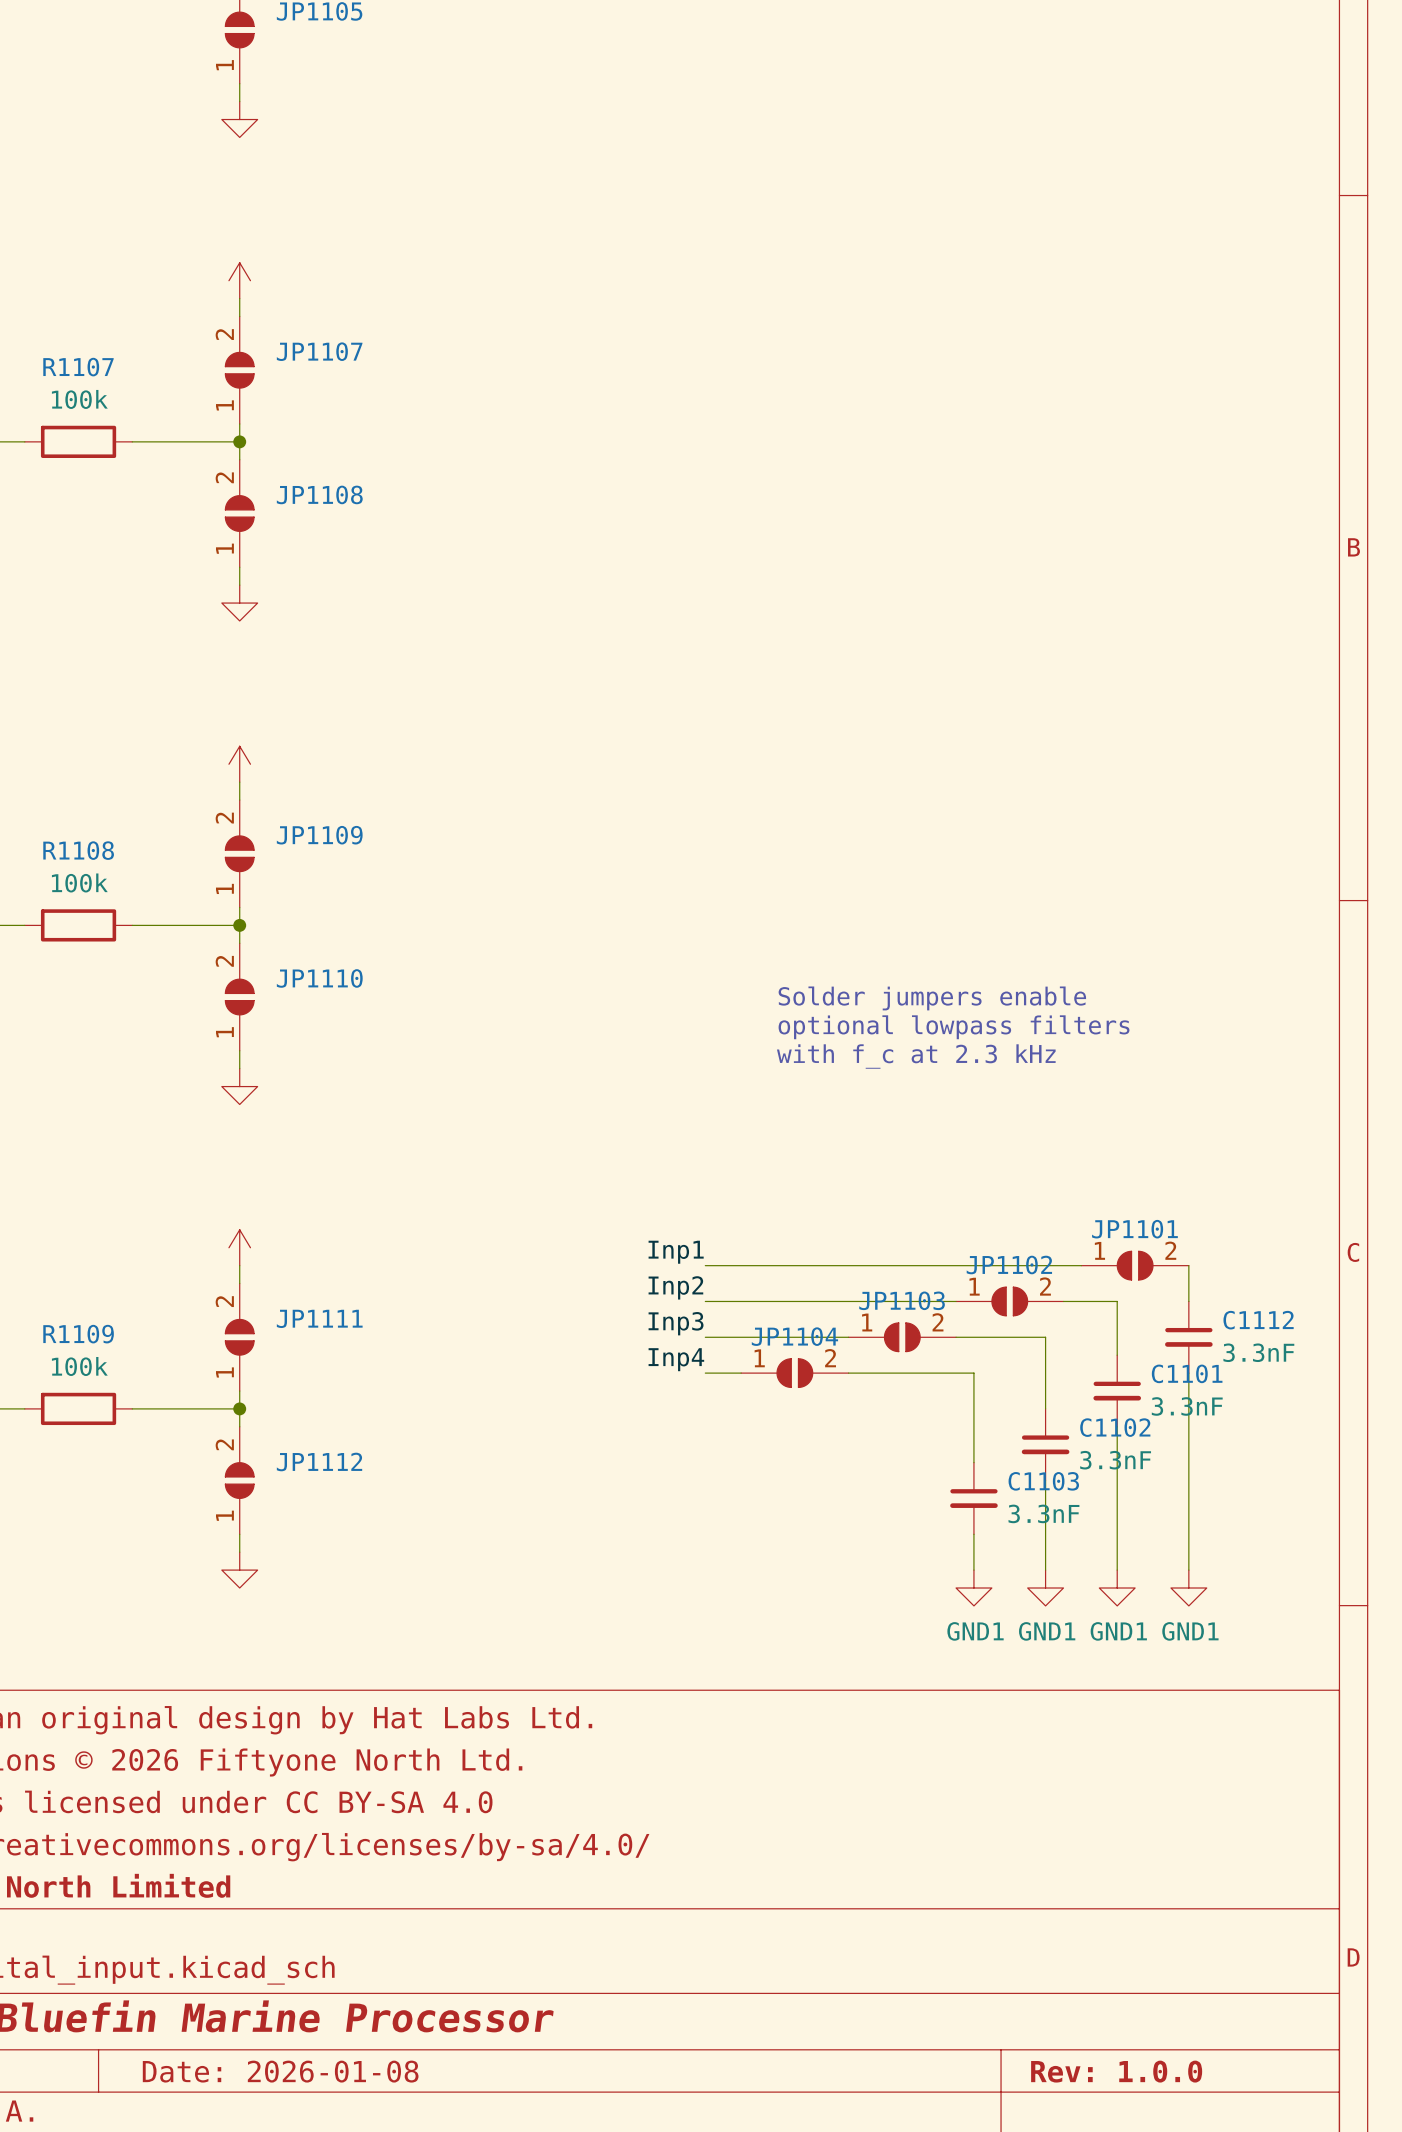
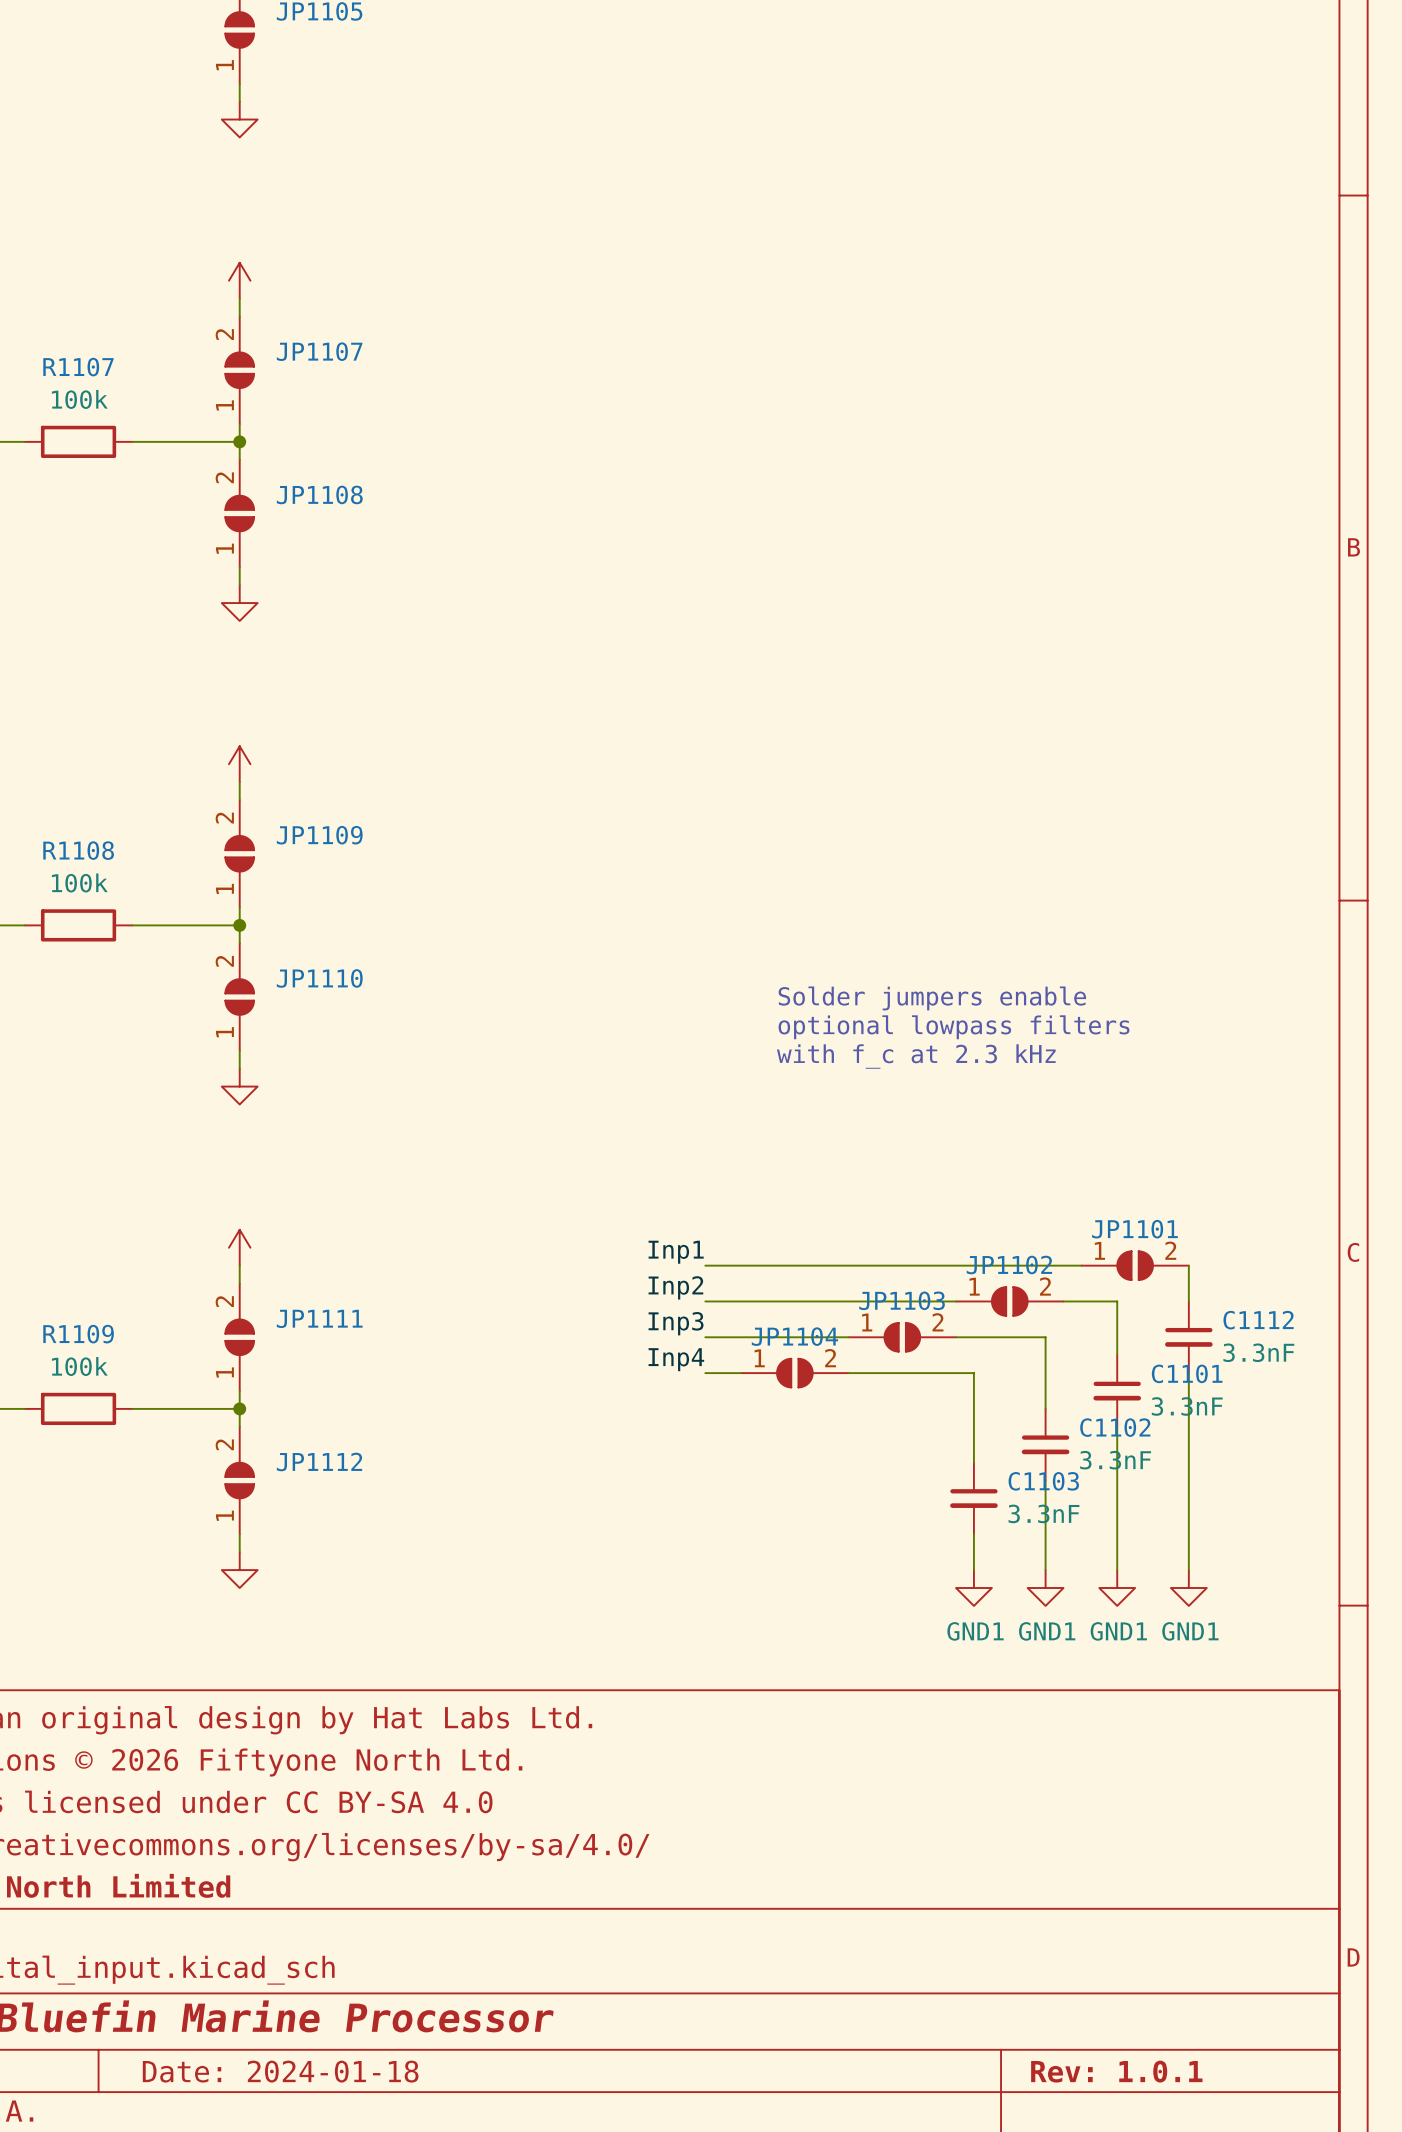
title block: Date: 2026-01-08 (280, 2071) -> Date: 2024-01-18 (280, 2071)
title block: Rev: 1.0.0 (1116, 2071) -> Rev: 1.0.1 (1116, 2071)

